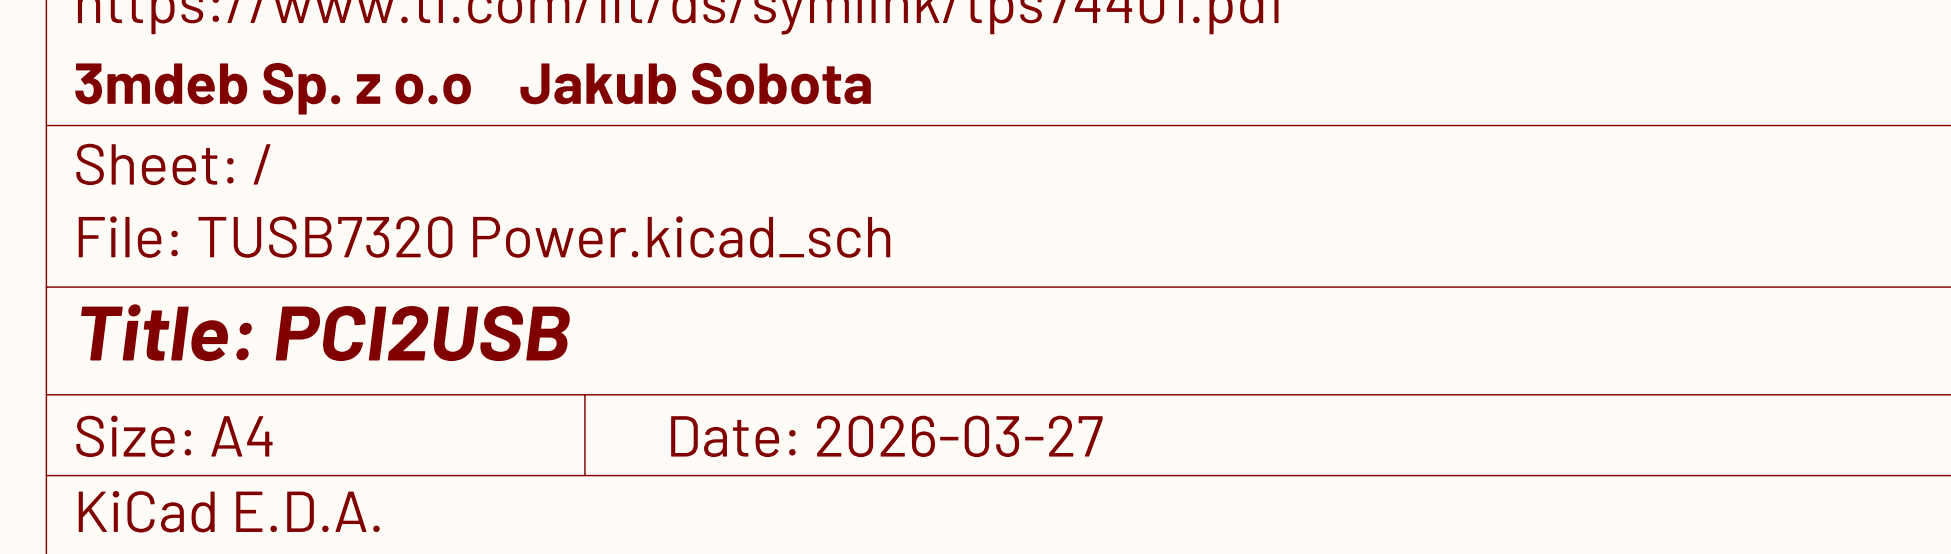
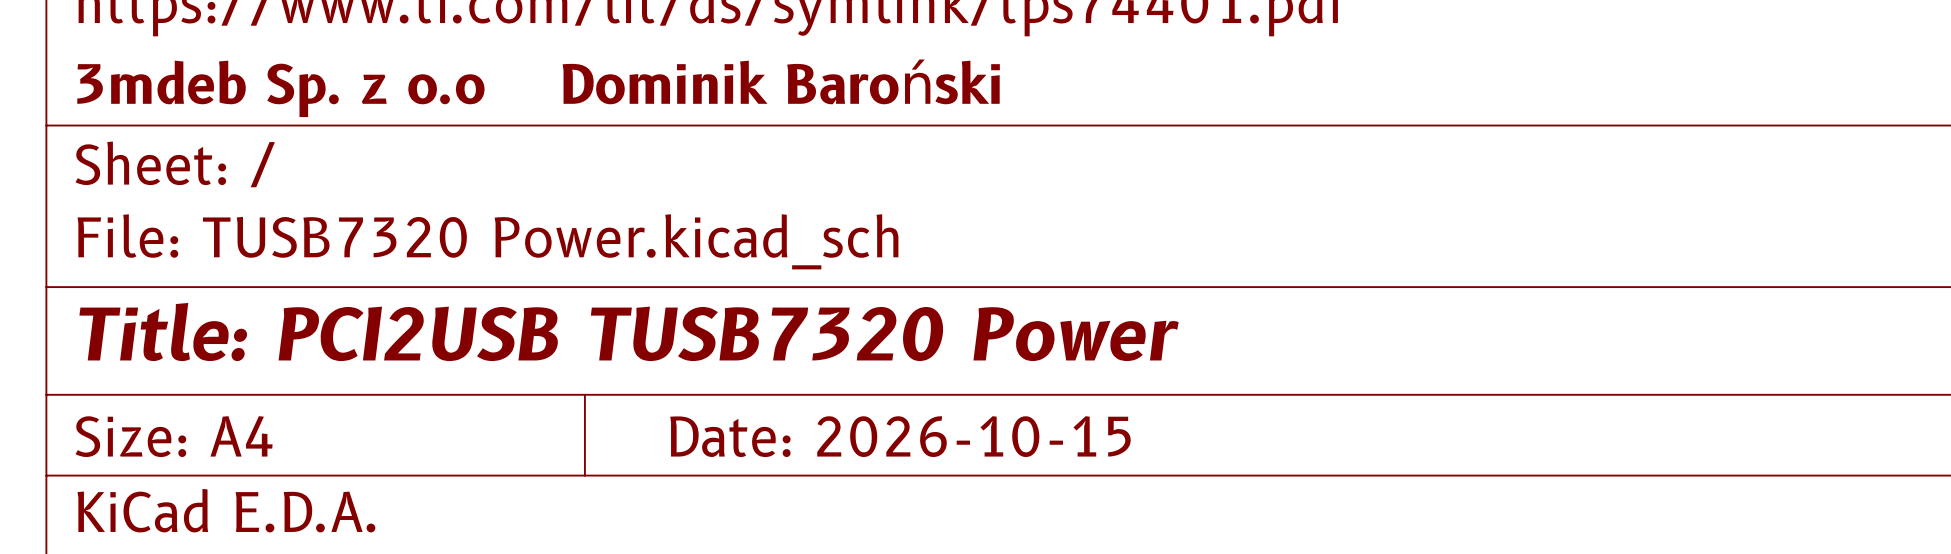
title block: 3mdeb Sp. z o.o Jakub Sobota (473, 88) -> 3mdeb Sp. z o.o Dominik Baroński (538, 88)
title block: Title: PCI2USB (326, 332) -> Title: PCI2USB TUSB7320 Power (629, 332)
title block: Date: 2026-03-27 (886, 436) -> Date: 2026-10-15 (900, 436)

